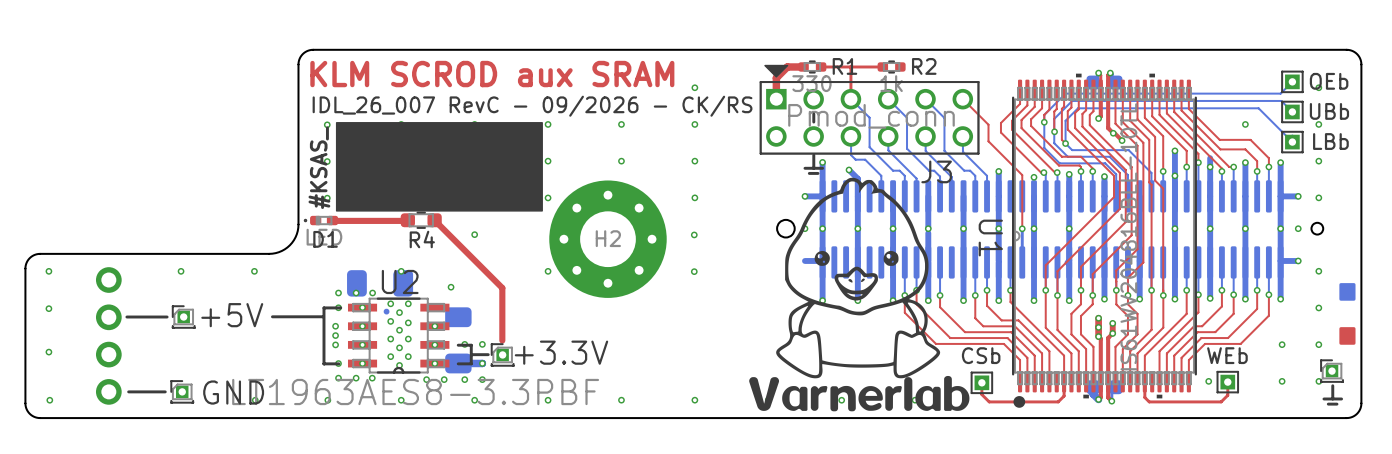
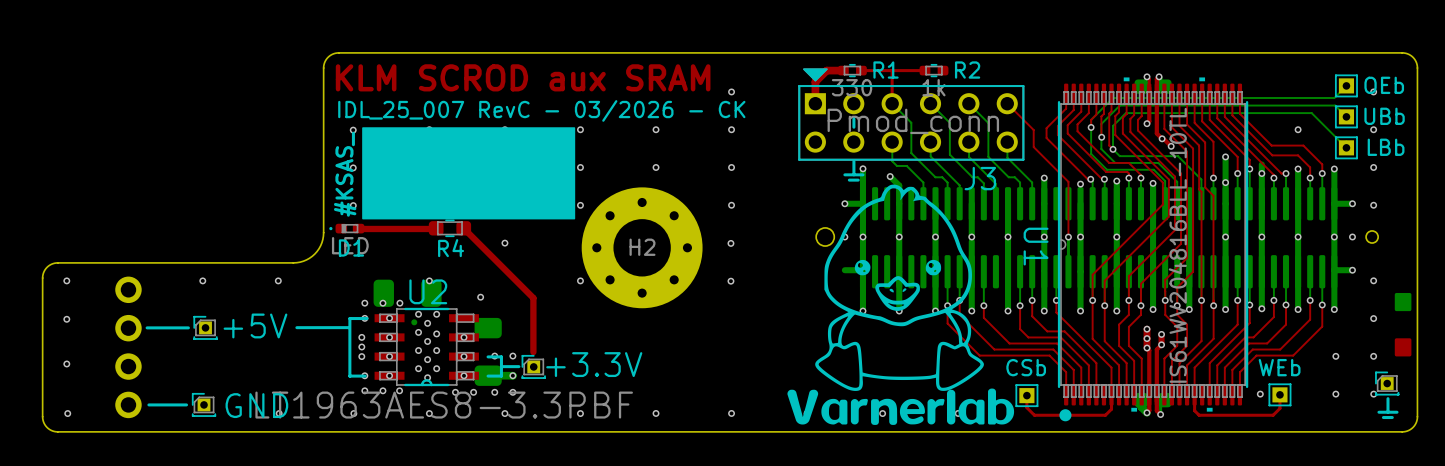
text: IDL_26_007 RevC - 09/2026 - CK/RS (532, 106) -> IDL_25_007 RevC - 03/2026 - CK (541, 110)

